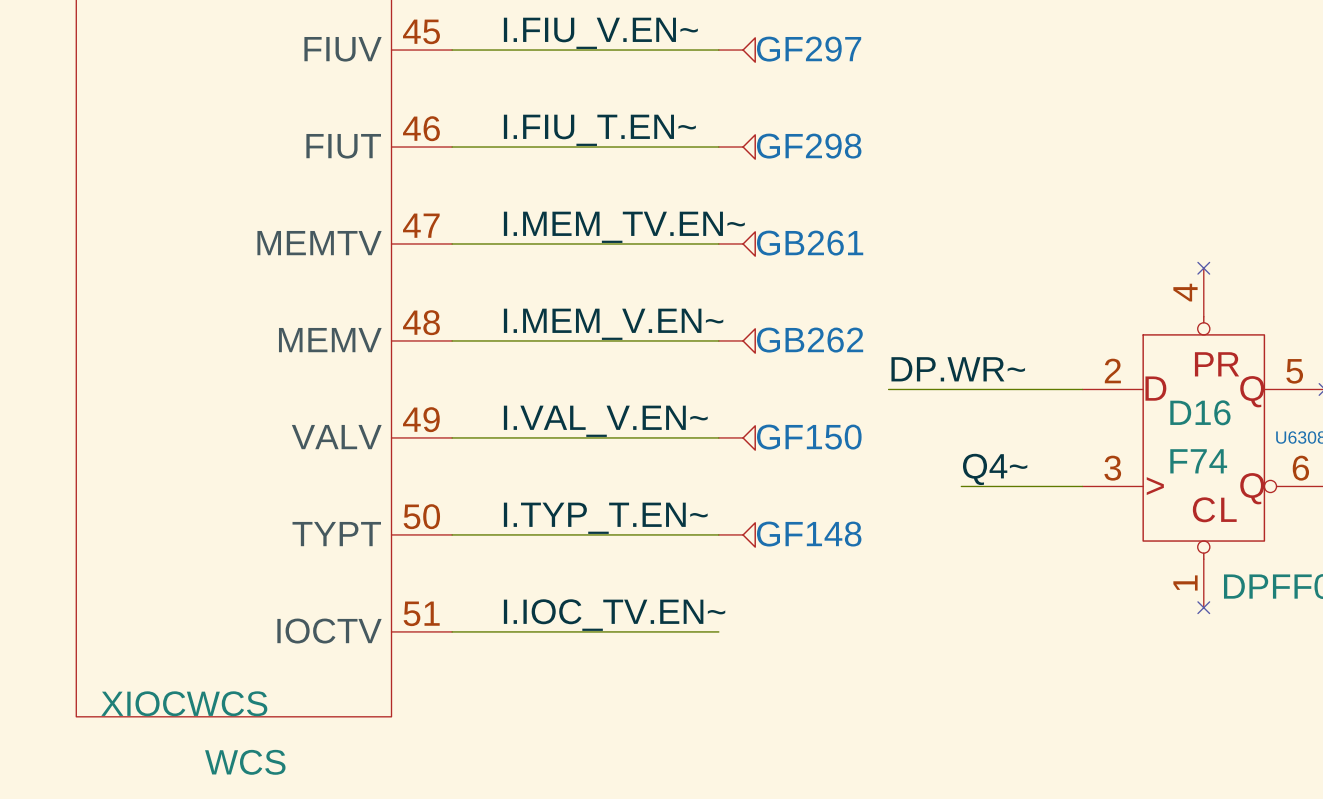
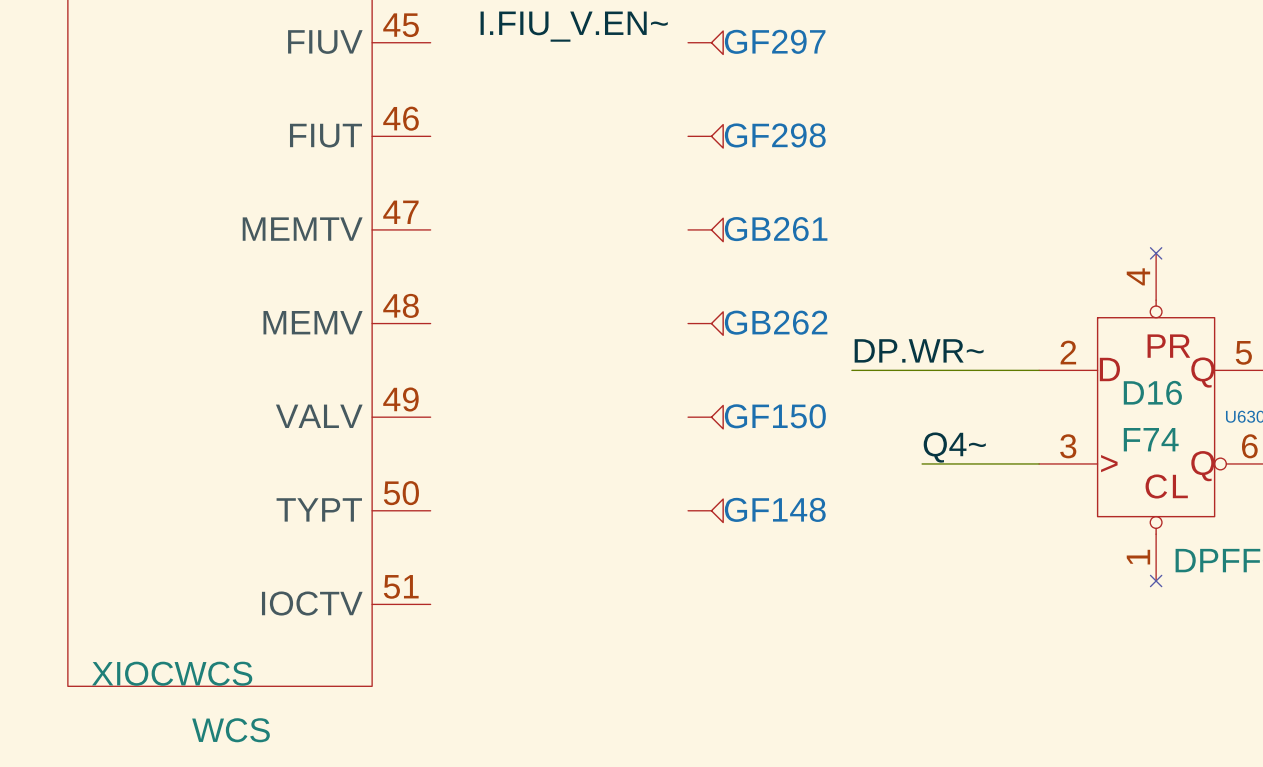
wire: (452, 50) (718, 50) -> none
label: I.FIU_T.EN~ (599, 130) -> none
wire: (452, 147) (718, 147) -> none
label: I.MEM_TV.EN~ (624, 227) -> none
wire: (452, 243) (718, 243) -> none
label: I.MEM_V.EN~ (613, 324) -> none
wire: (452, 340) (718, 340) -> none
label: I.VAL_V.EN~ (605, 421) -> none
wire: (452, 437) (718, 437) -> none
label: I.TYP_T.EN~ (605, 518) -> none
wire: (452, 534) (718, 534) -> none
label: I.IOC_TV.EN~ (614, 615) -> none
wire: (452, 631) (718, 631) -> none

